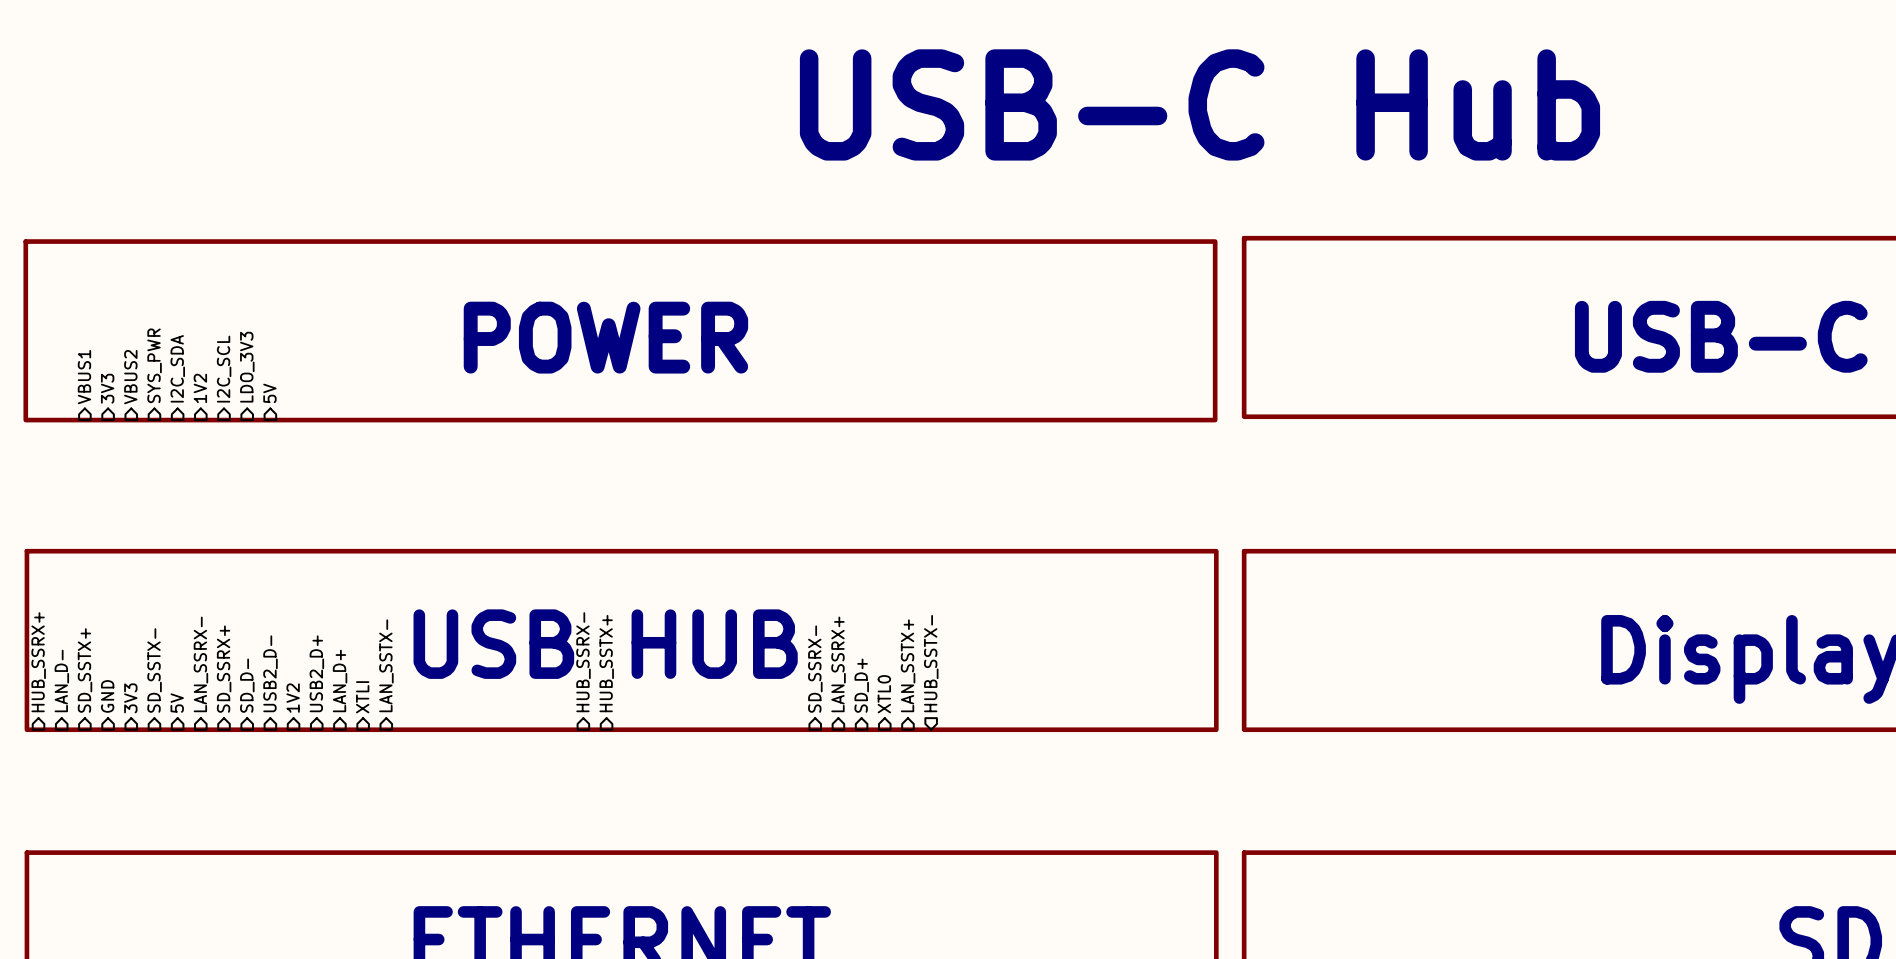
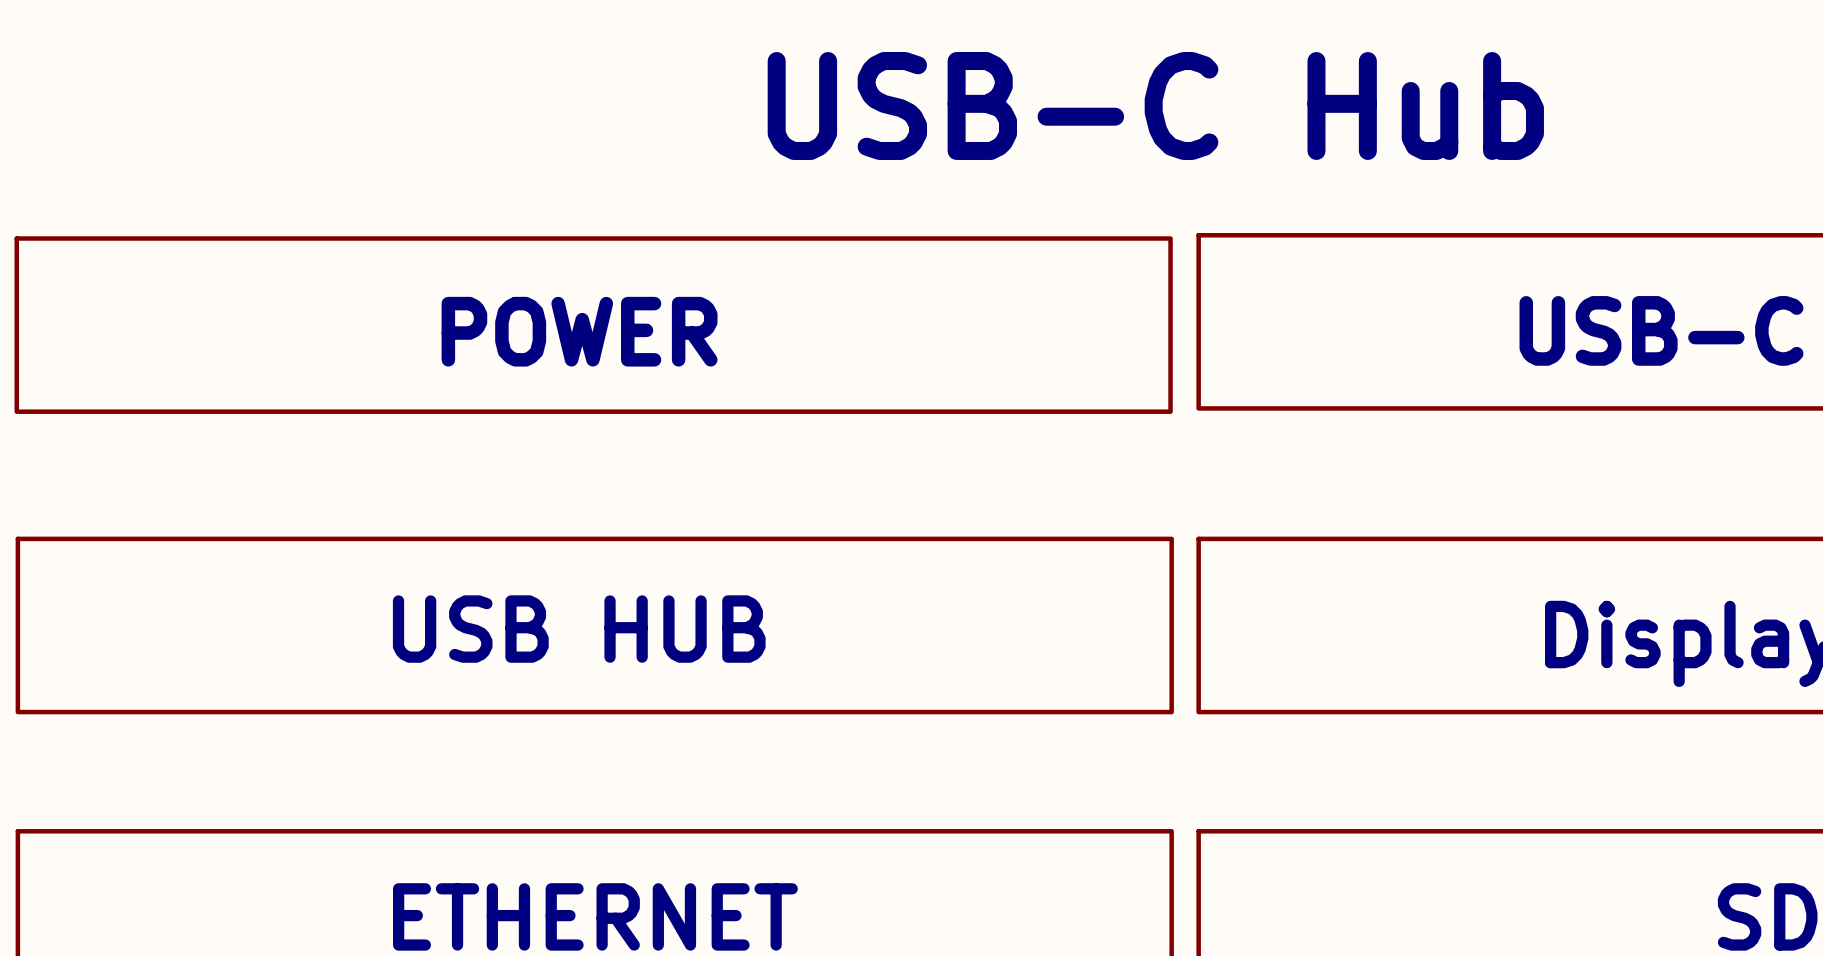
sheet pin: SYS_PWR (154, 365) -> none
sheet pin: LDO_3V3 (247, 367) -> none
sheet pin: I2C_SDA (177, 368) -> none
sheet pin: I2C_SCL (224, 369) -> none
sheet pin: VBUS1 (84, 377) -> none
sheet pin: VBUS2 (130, 377) -> none
sheet pin: 3V3 (107, 388) -> none
sheet pin: 1V2 (200, 388) -> none
sheet pin: 5V (269, 393) -> none
sheet pin: HUB_SSRX+ (38, 662) -> none
sheet pin: HUB_SSRX- (583, 662) -> none
sheet pin: HUB_SSTX+ (606, 663) -> none
sheet pin: HUB_SSTX- (931, 663) -> none
sheet pin: LAN_SSRX- (200, 664) -> none
sheet pin: LAN_SSRX+ (838, 664) -> none
sheet pin: LAN_SSTX- (386, 665) -> none
sheet pin: LAN_SSTX+ (908, 665) -> none
sheet pin: SD_SSRX+ (224, 669) -> none
sheet pin: SD_SSRX- (815, 669) -> none
sheet pin: SD_SSTX+ (85, 670) -> none
sheet pin: SD_SSTX- (154, 670) -> none
sheet pin: USB2_D- (270, 673) -> none
sheet pin: USB2_D+ (316, 673) -> none
sheet pin: LAN_D- (61, 680) -> none
sheet pin: LAN_D+ (340, 680) -> none
sheet pin: SD_D- (247, 685) -> none
sheet pin: SD_D+ (861, 685) -> none
sheet pin: XTL0 (884, 694) -> none
sheet pin: GND (107, 696) -> none
sheet pin: XTLI (362, 697) -> none
sheet pin: 3V3 (130, 698) -> none
sheet pin: 1V2 (293, 698) -> none
sheet pin: 5V (177, 703) -> none

